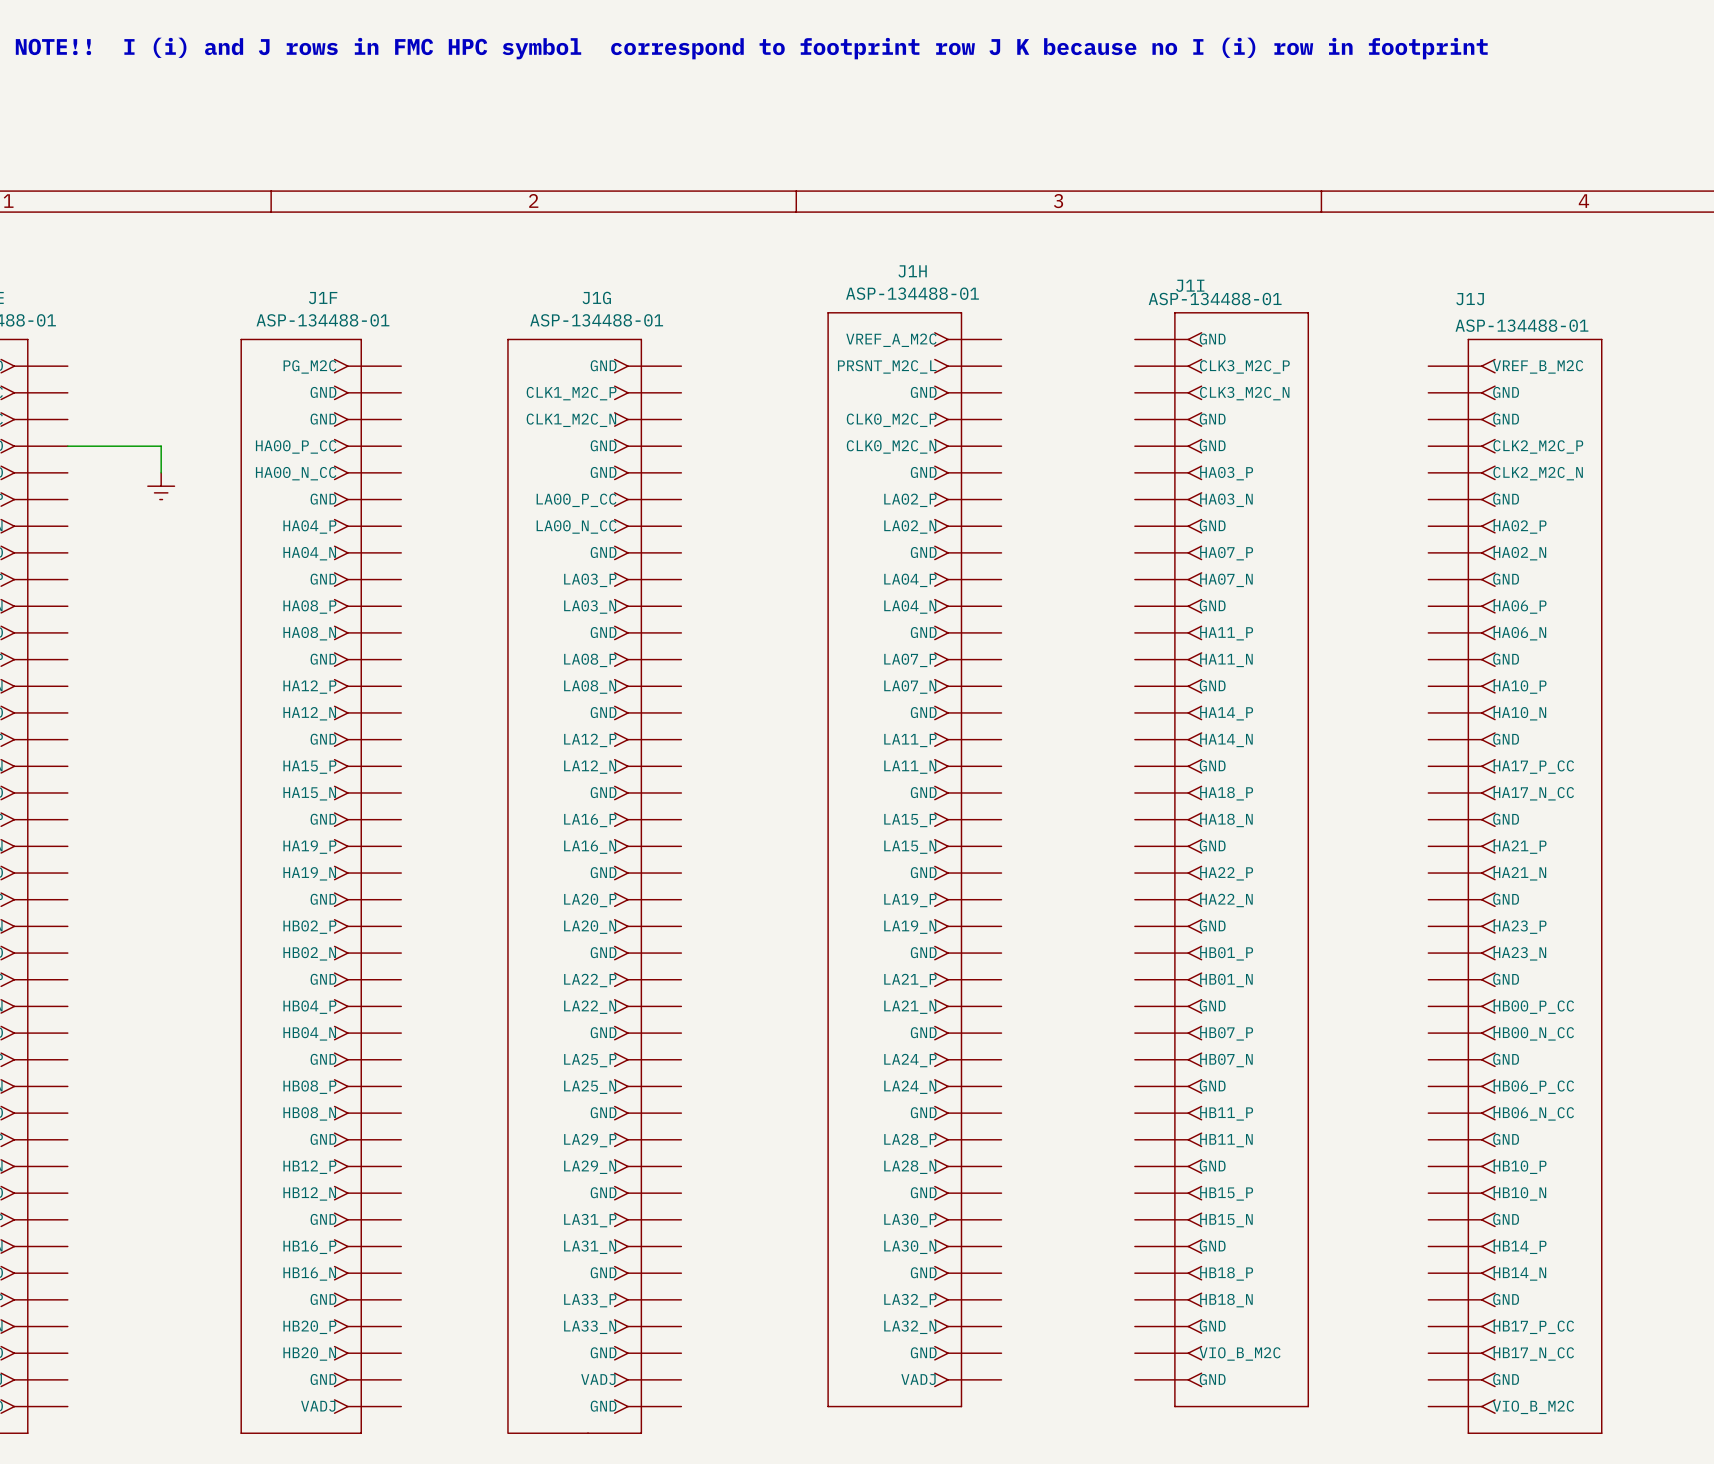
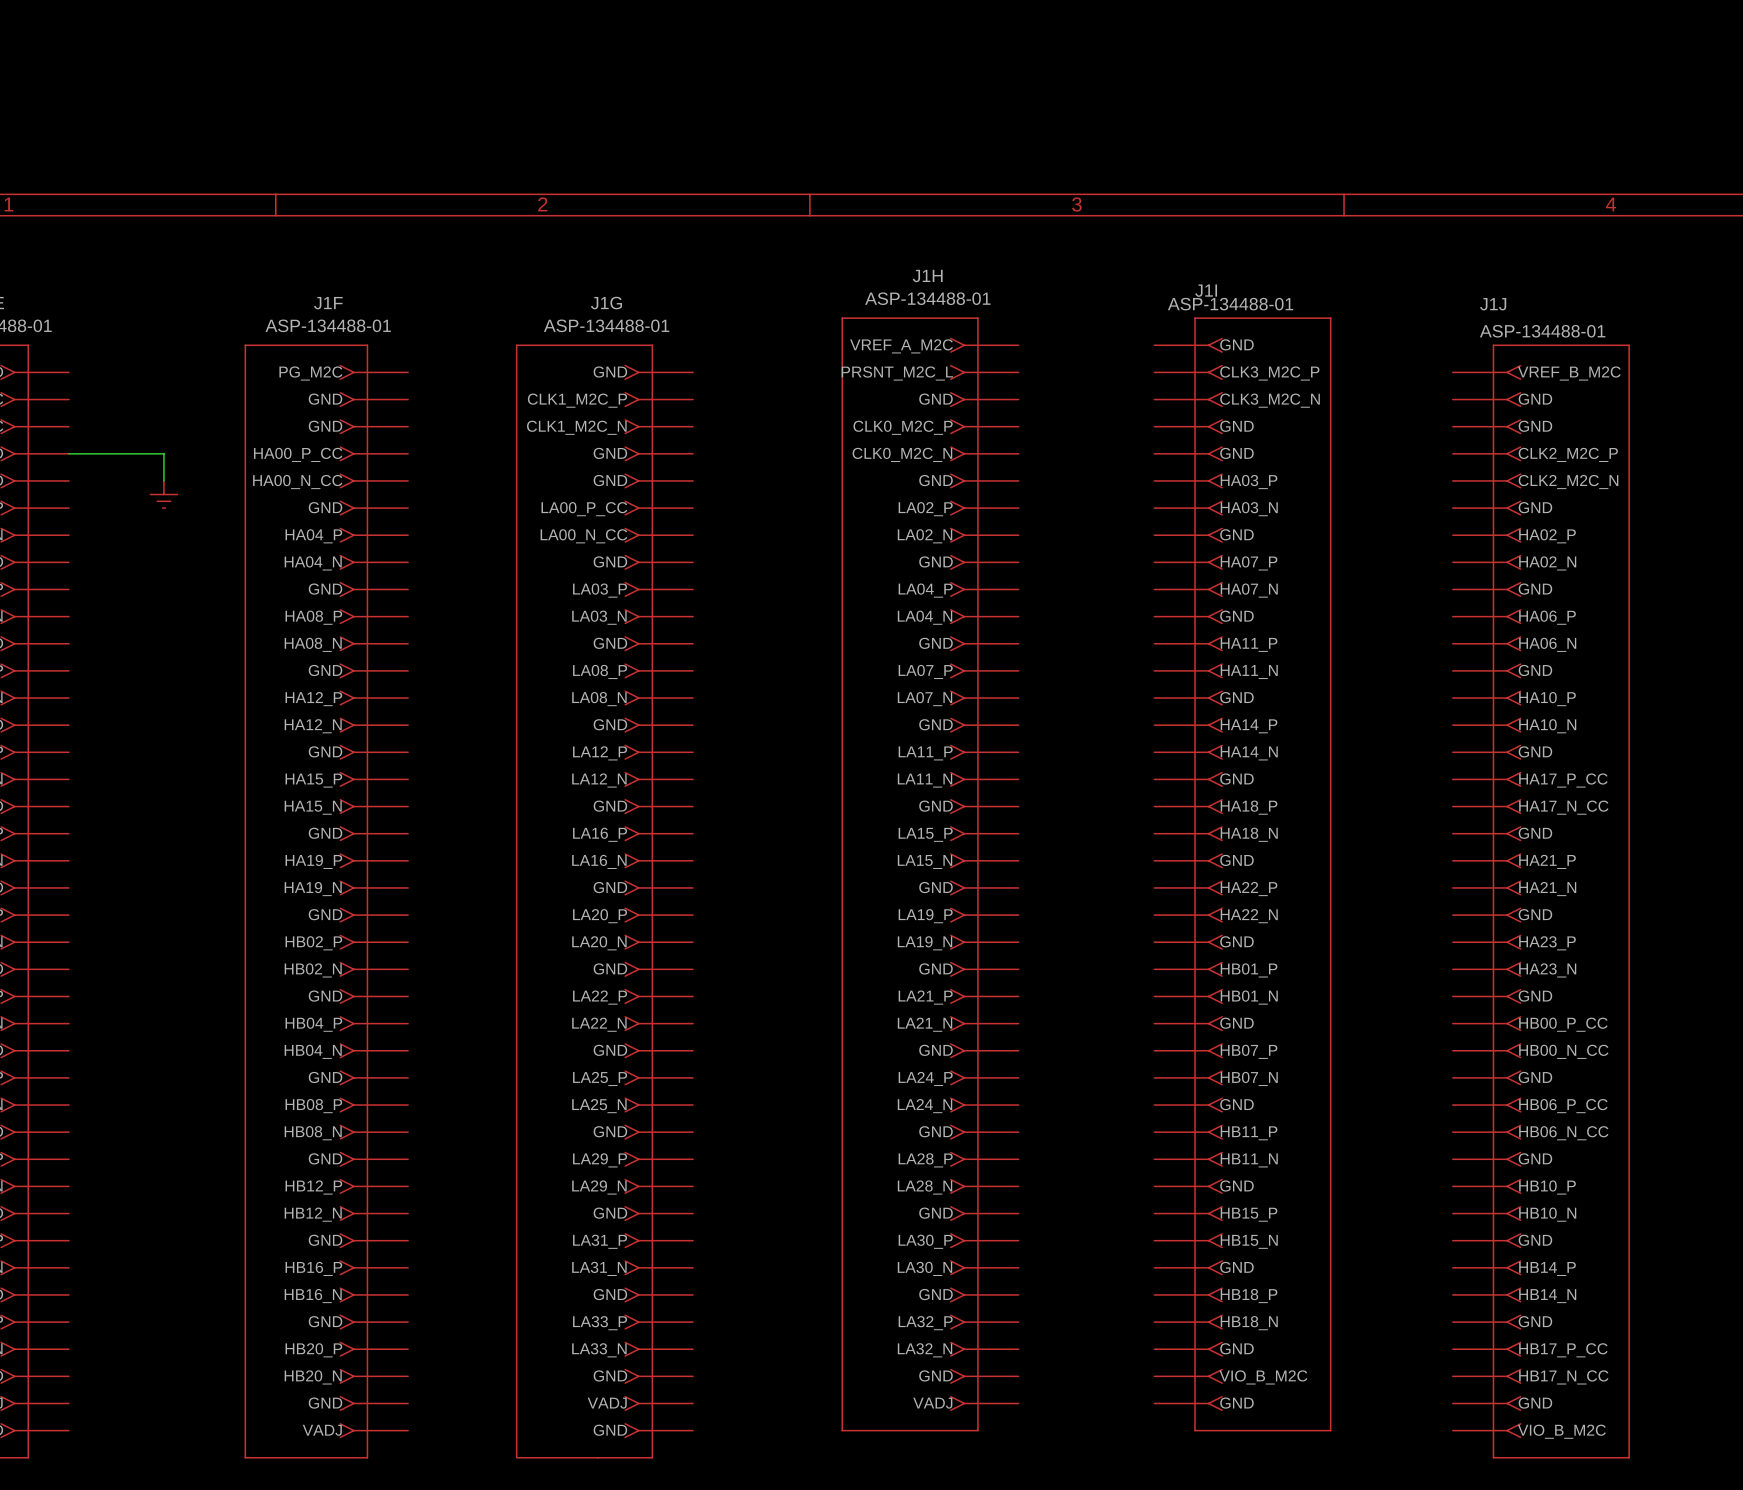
text: NOTE!! I (i) and J rows in FMC HPC symbol correspond to footprint row J K because no I (i) row in footprint (751, 48) -> none

